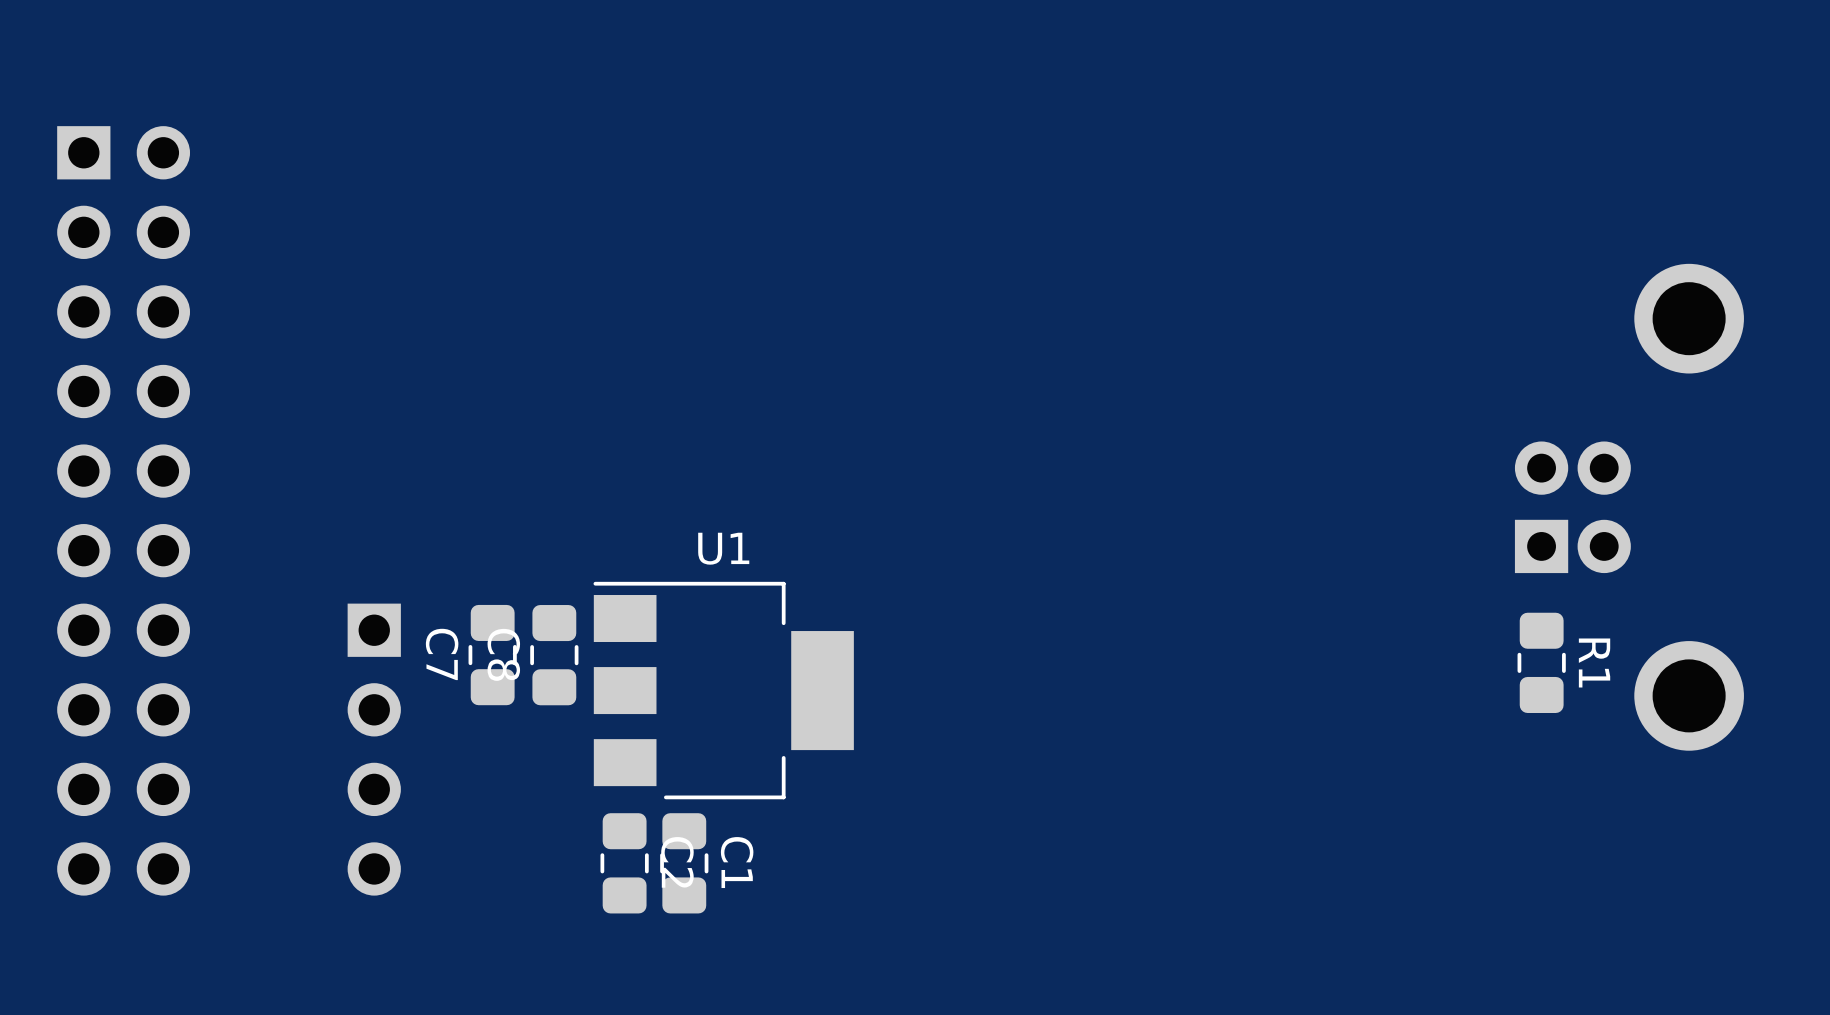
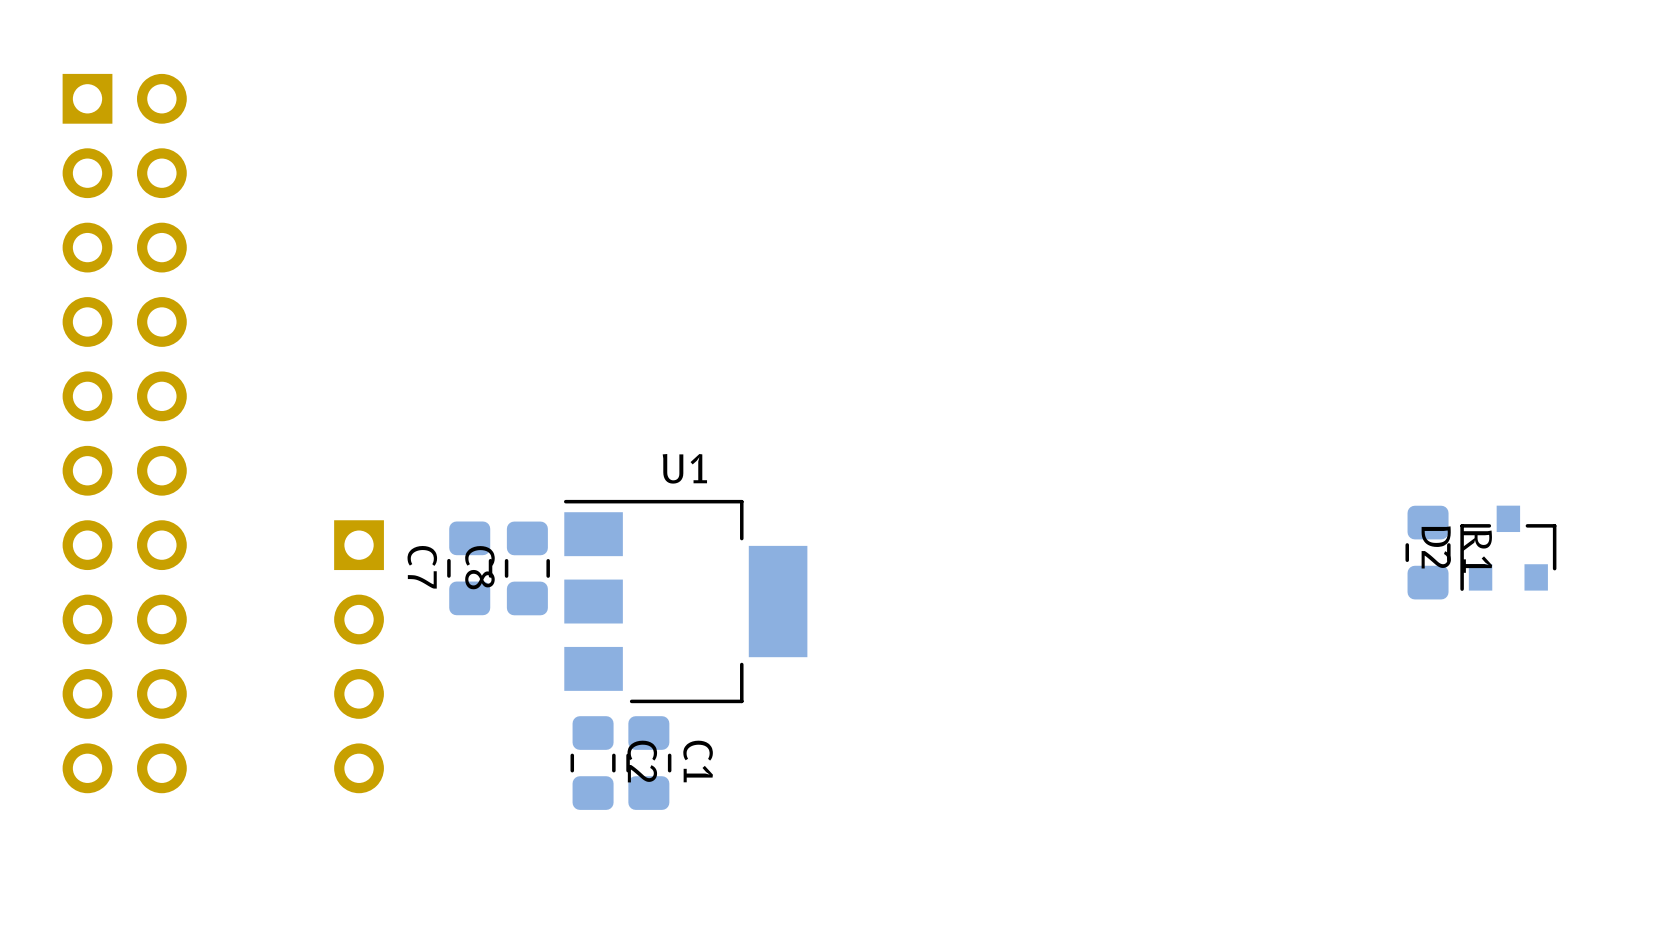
part: (1629, 507) -> none
D2: none -> (1508, 548)
R1 position: (1541, 662) -> (1428, 552)

